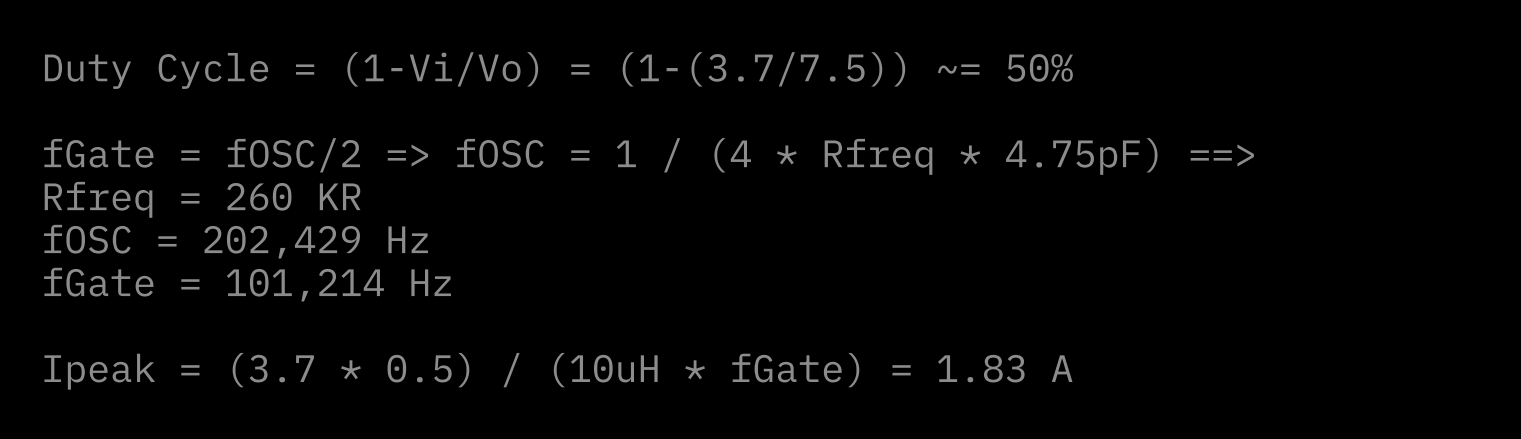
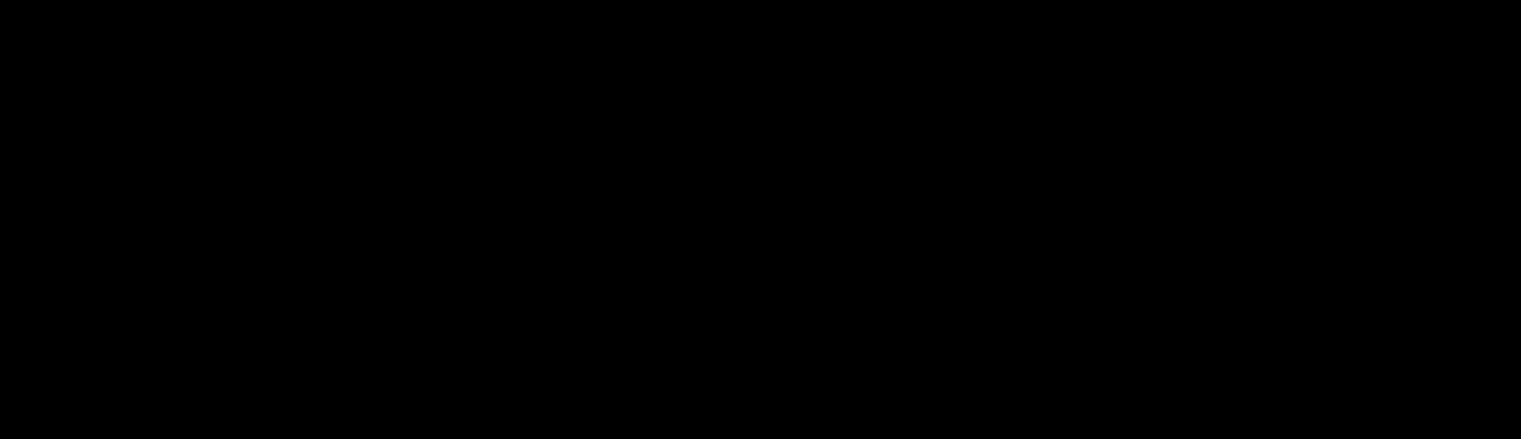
text: Duty Cycle = (1-Vi/Vo) = (1-(3.7/7.5)) ~= 50% (558, 70) -> none
text: fGate = fOSC/2 => fOSC = 1 / (4 * Rfreq * 4.75pF) ==> (648, 156) -> none
text: Rfreq = 260 KR (202, 199) -> none
text: fOSC = 202,429 Hz (236, 241) -> none
text: fGate = 101,214 Hz (247, 284) -> none
text: Ipeak = (3.7 * 0.5) / (10uH * fGate) = 1.83 A (558, 371) -> none

